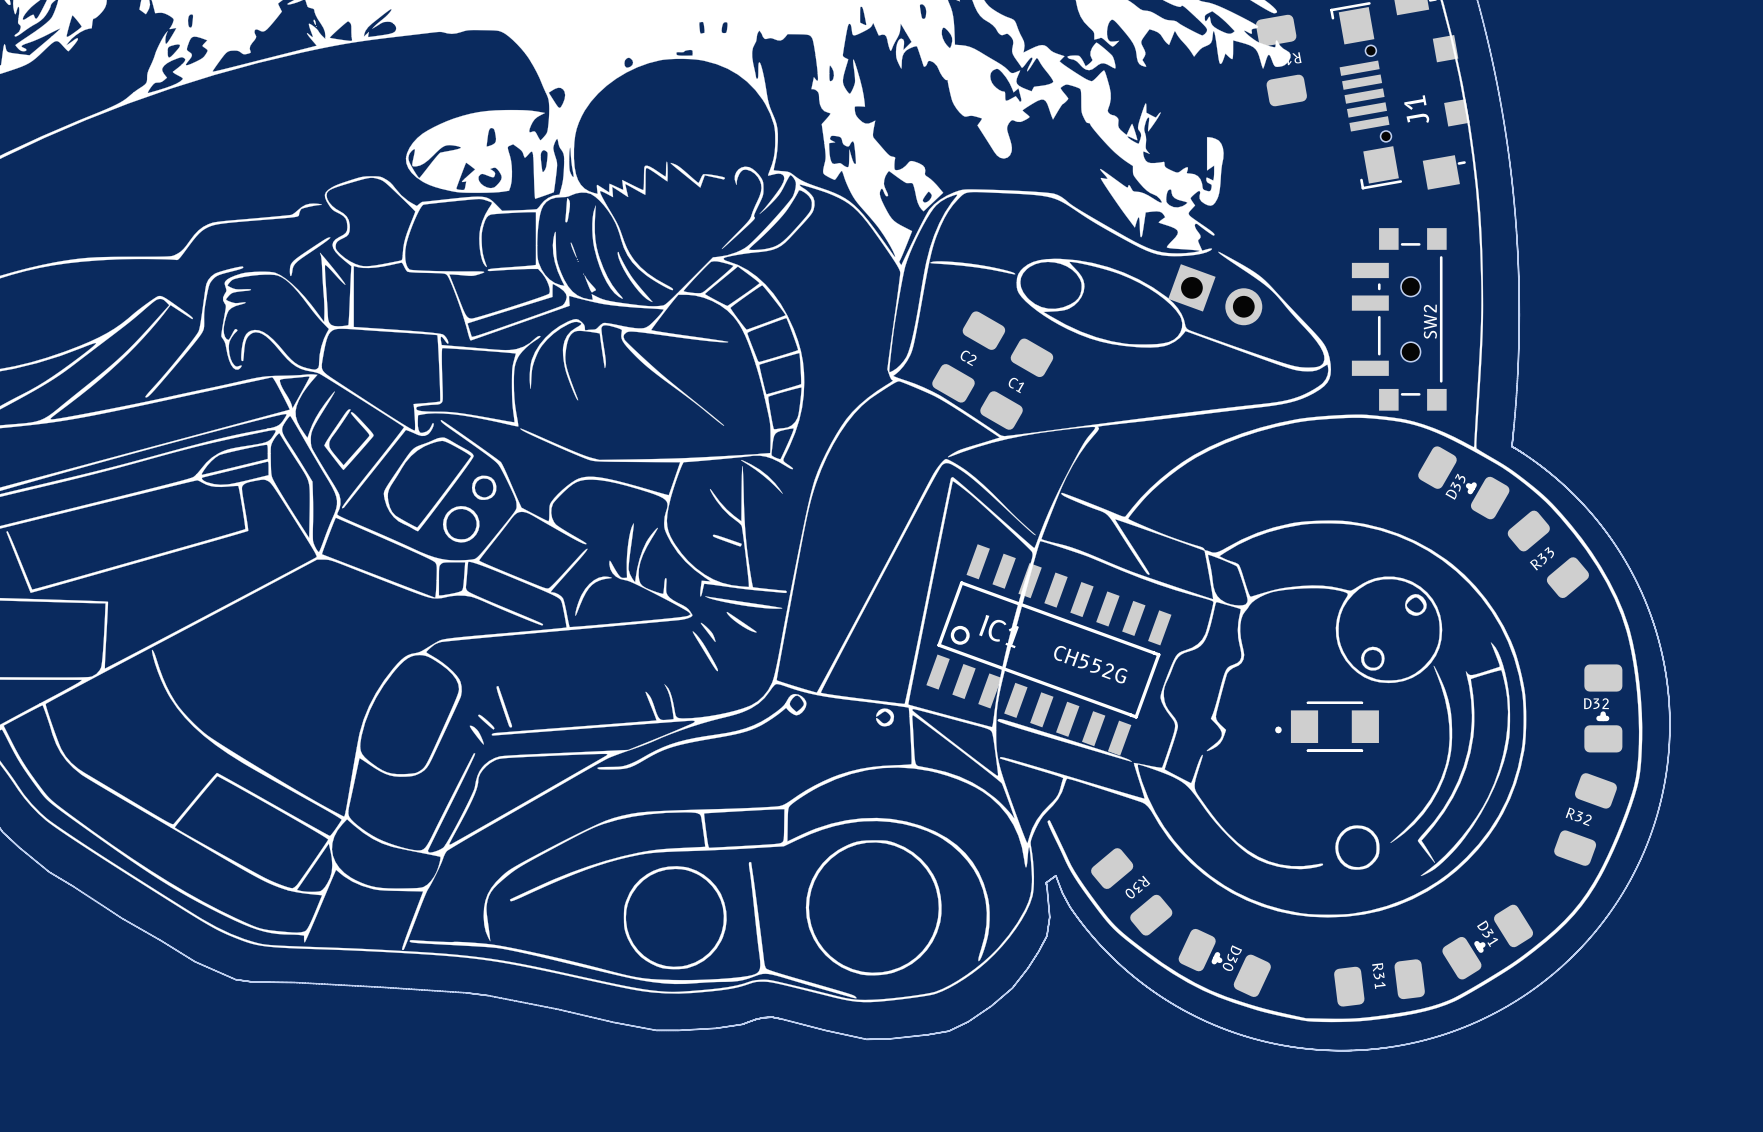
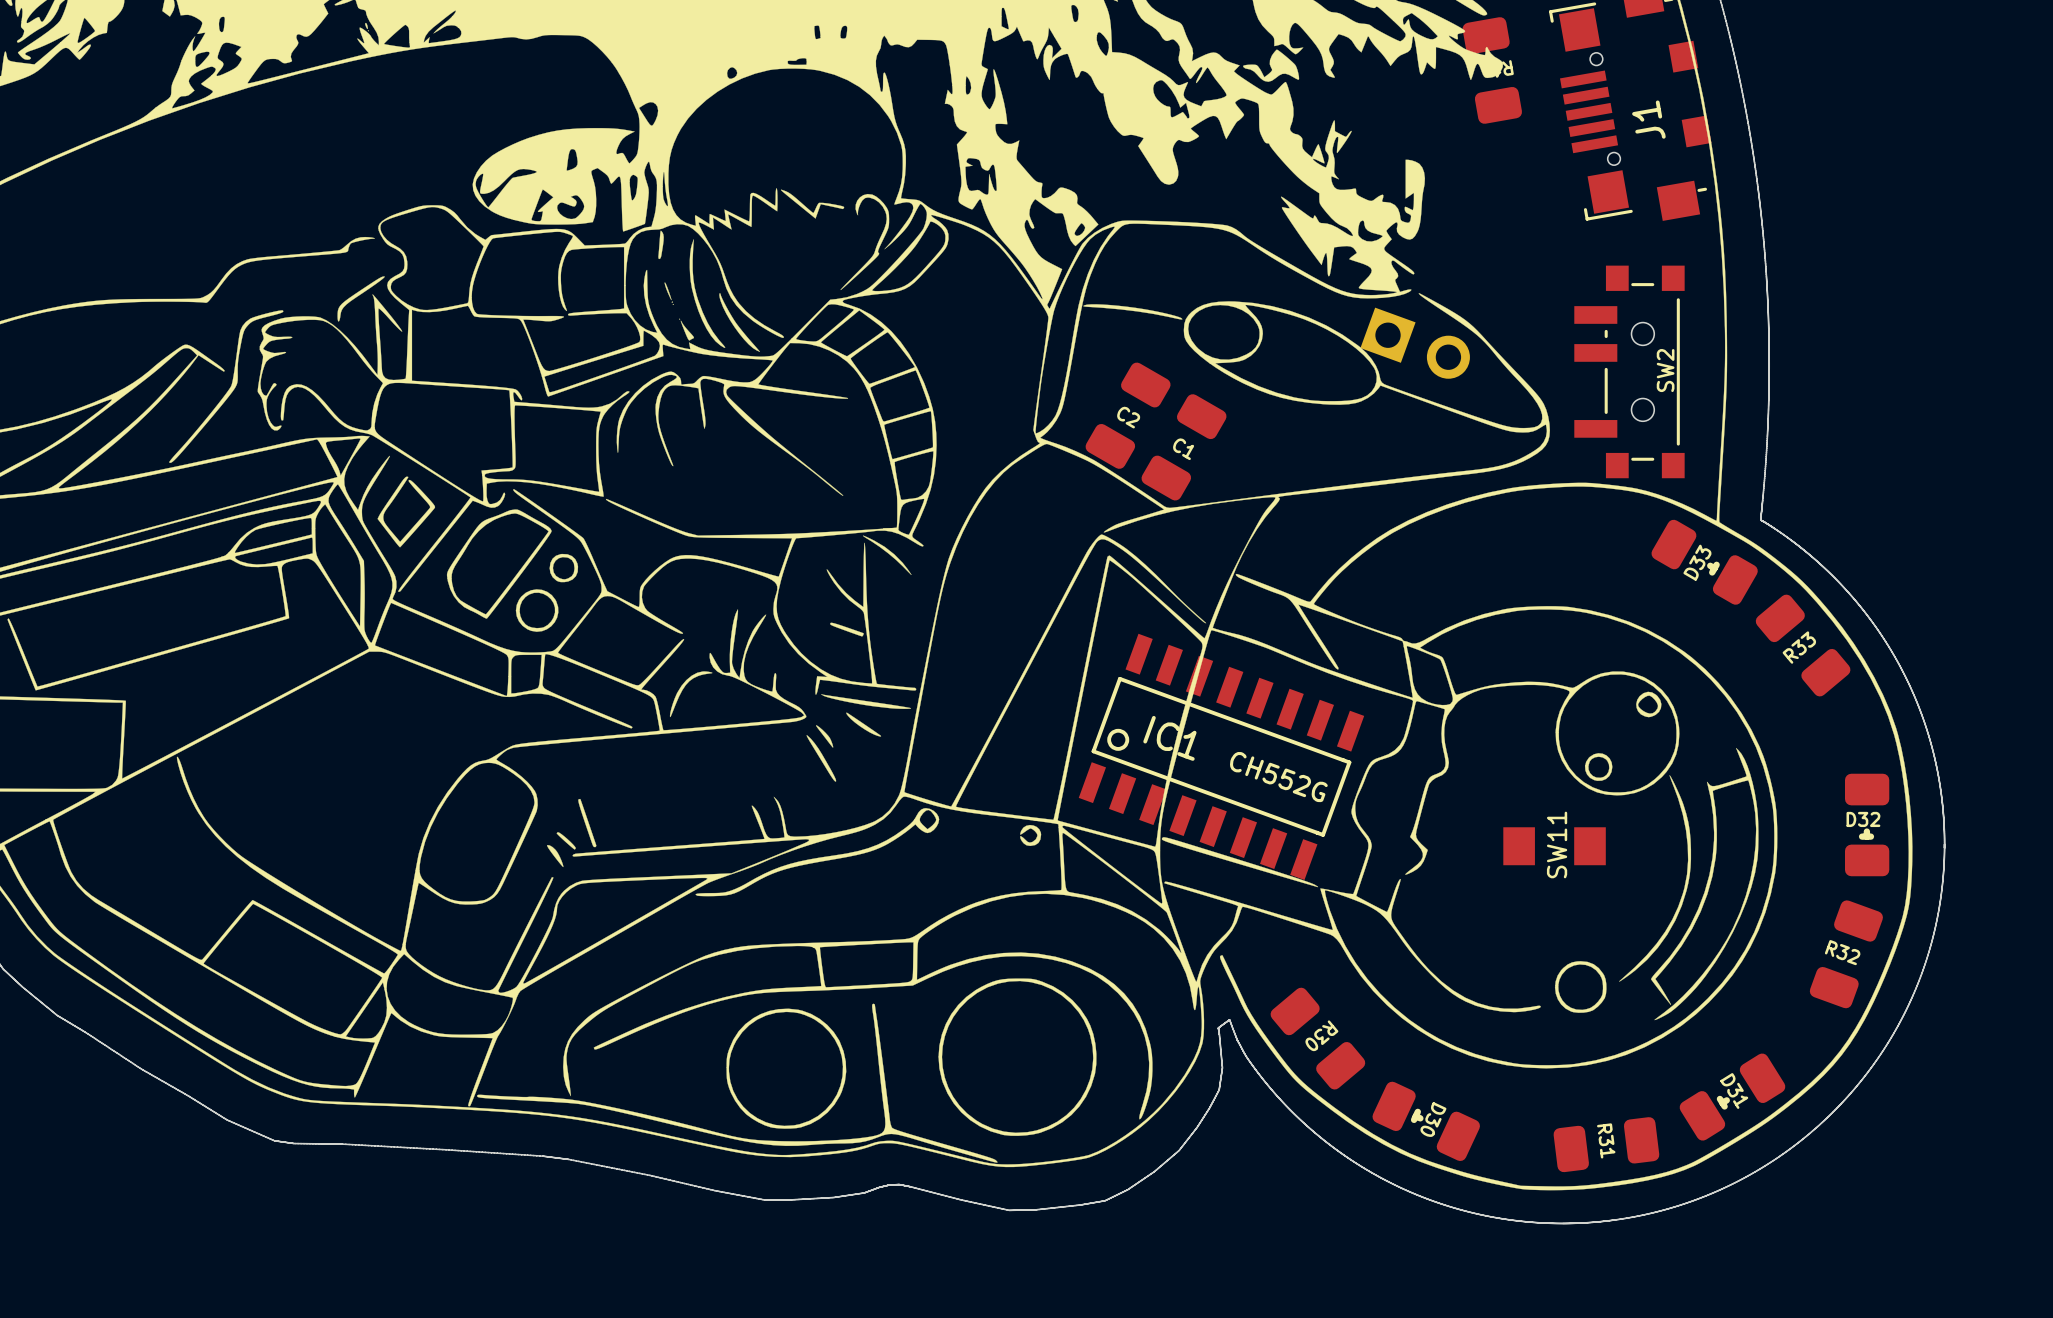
part: (1327, 726) -> none
SW11: none -> (1554, 846)

